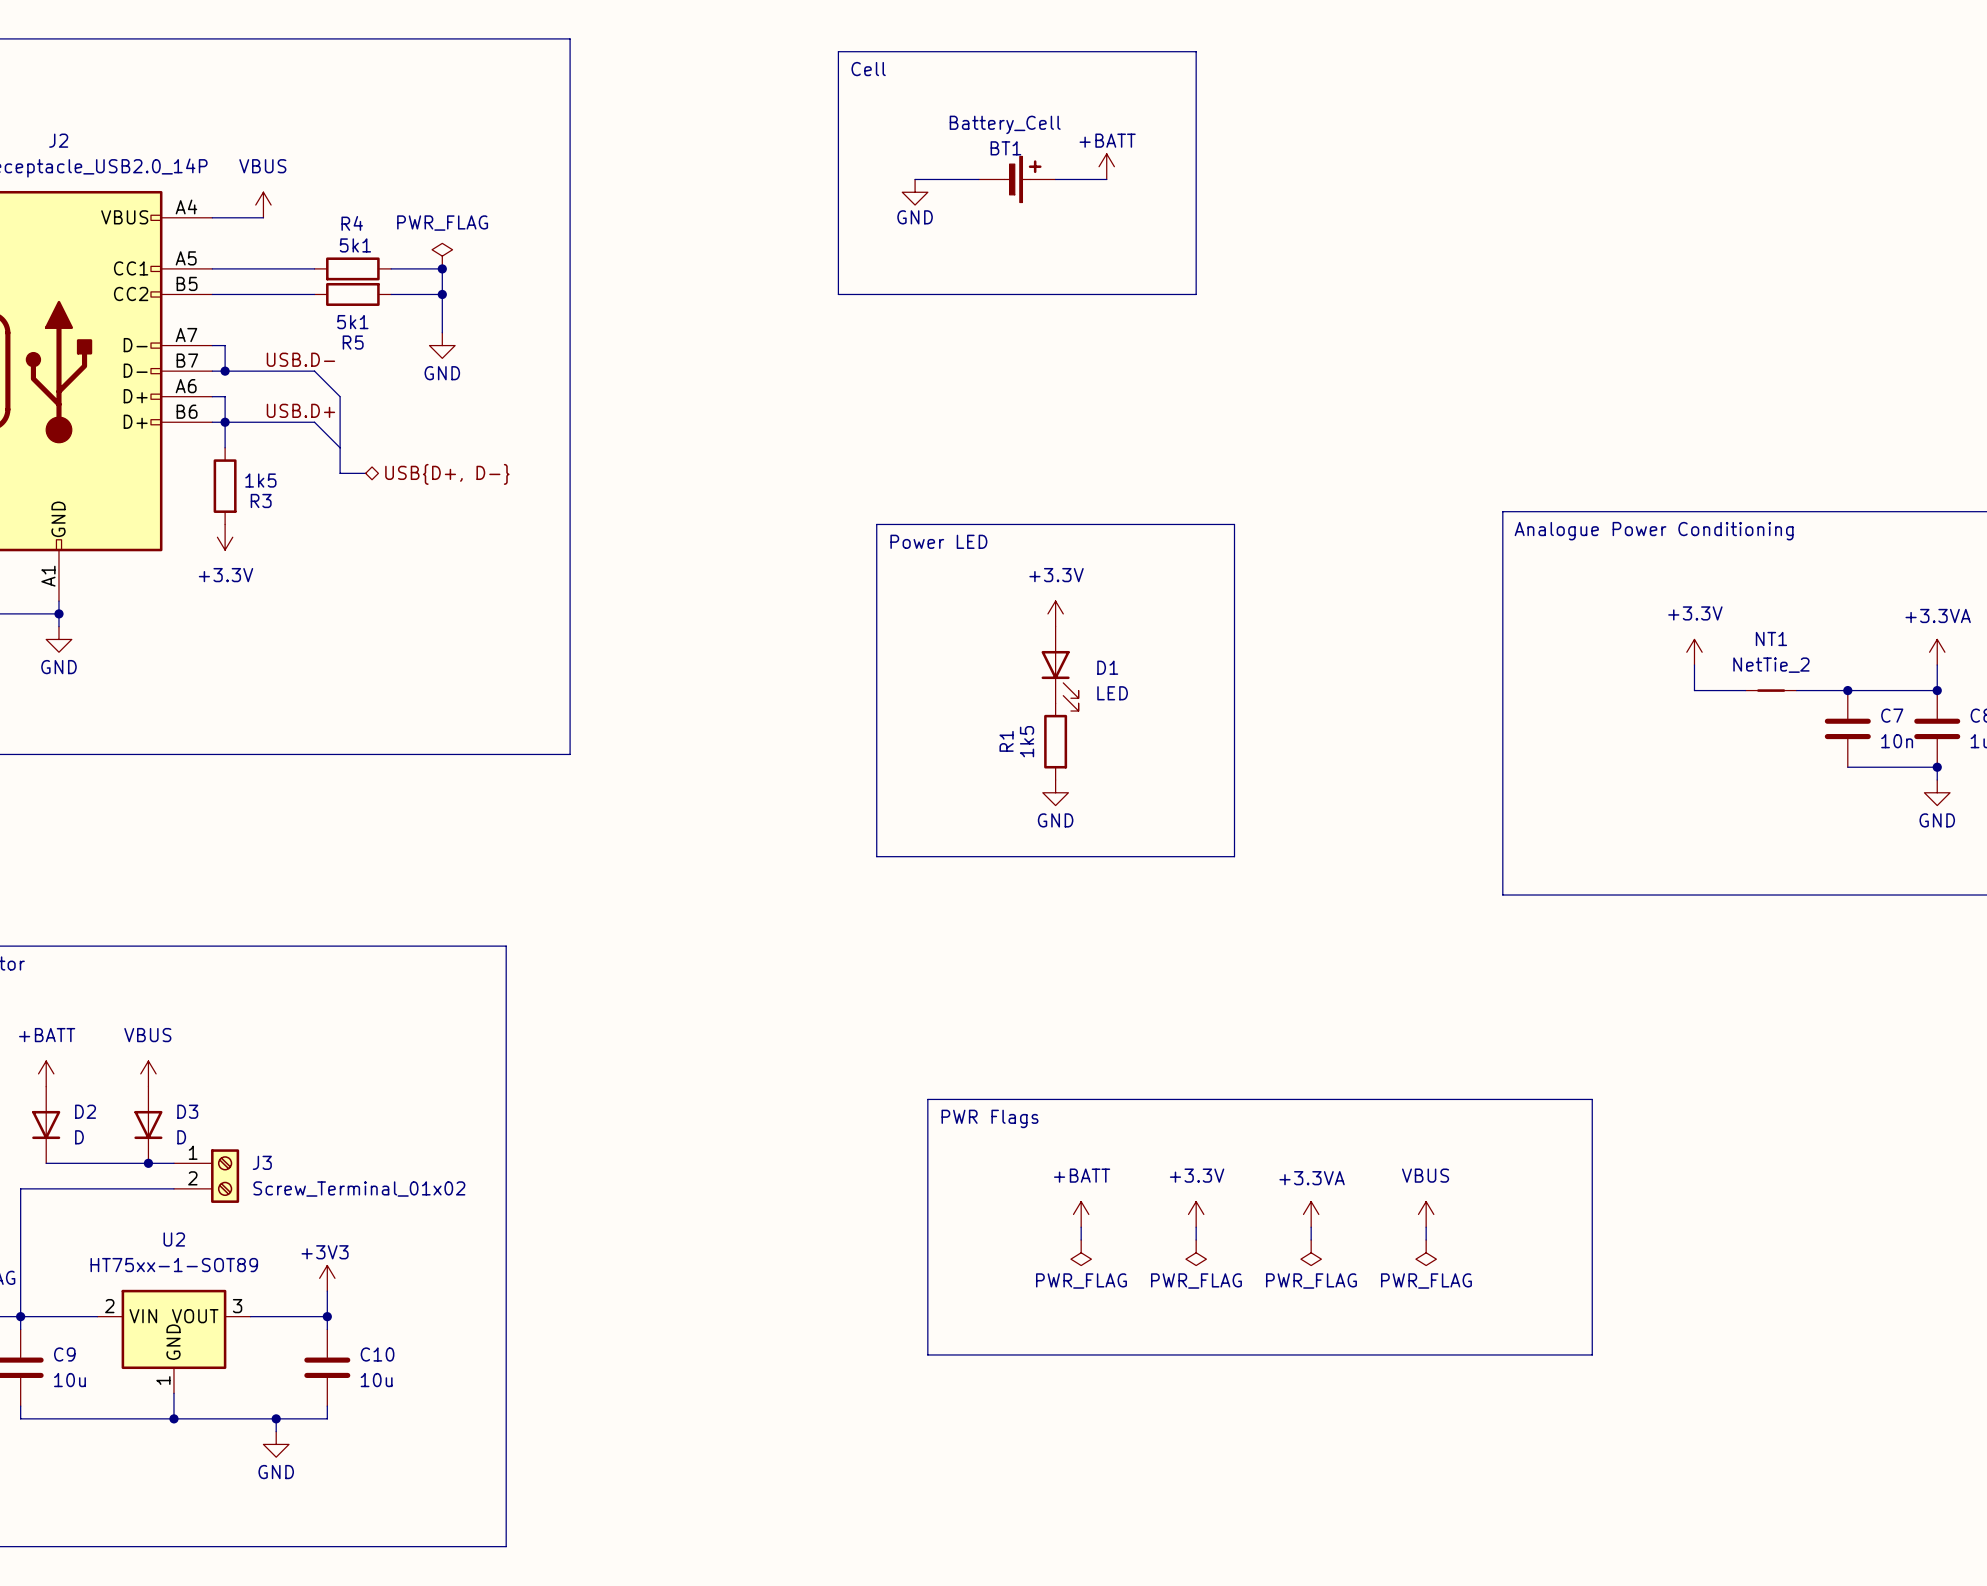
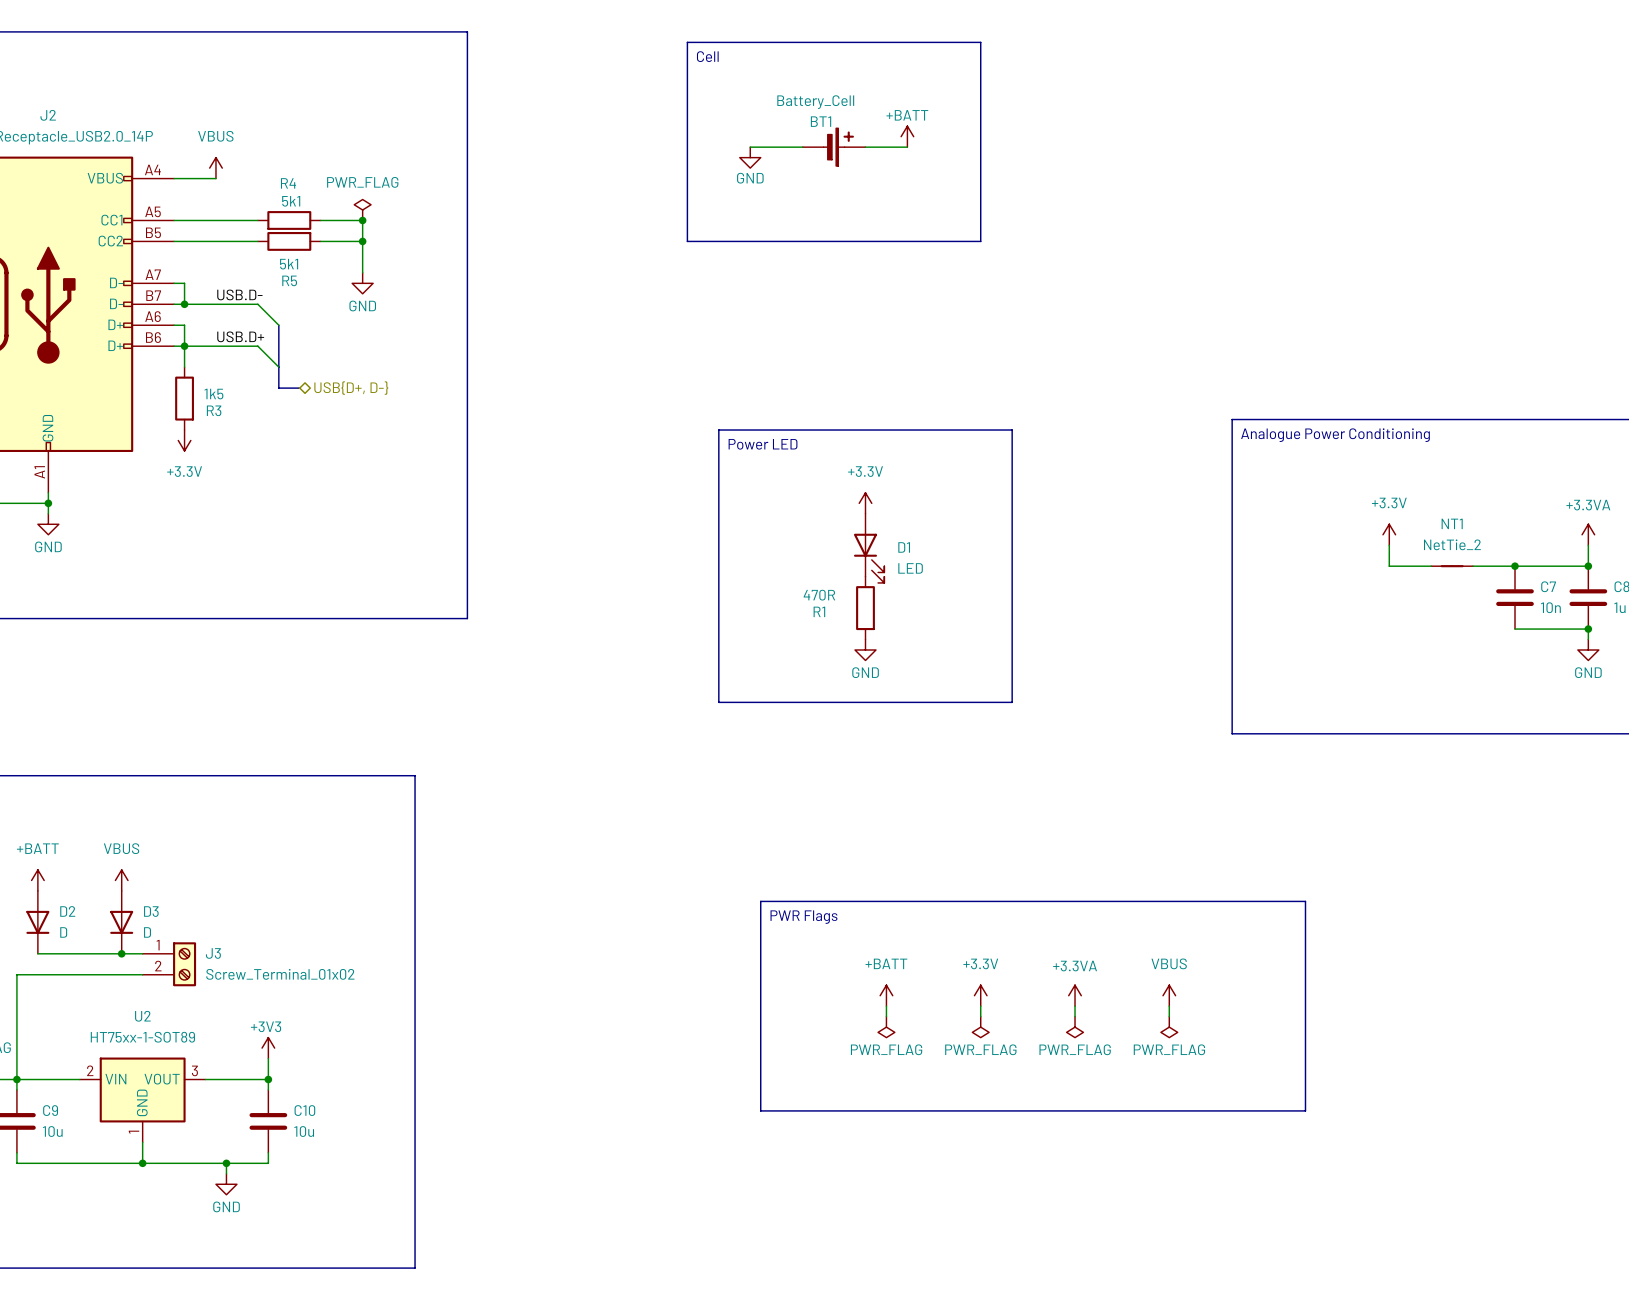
R1 name rotation: 0° (1006, 741) -> 90° clockwise (819, 611)
R1 value: 1k5 (1027, 741) -> 470R (819, 595)

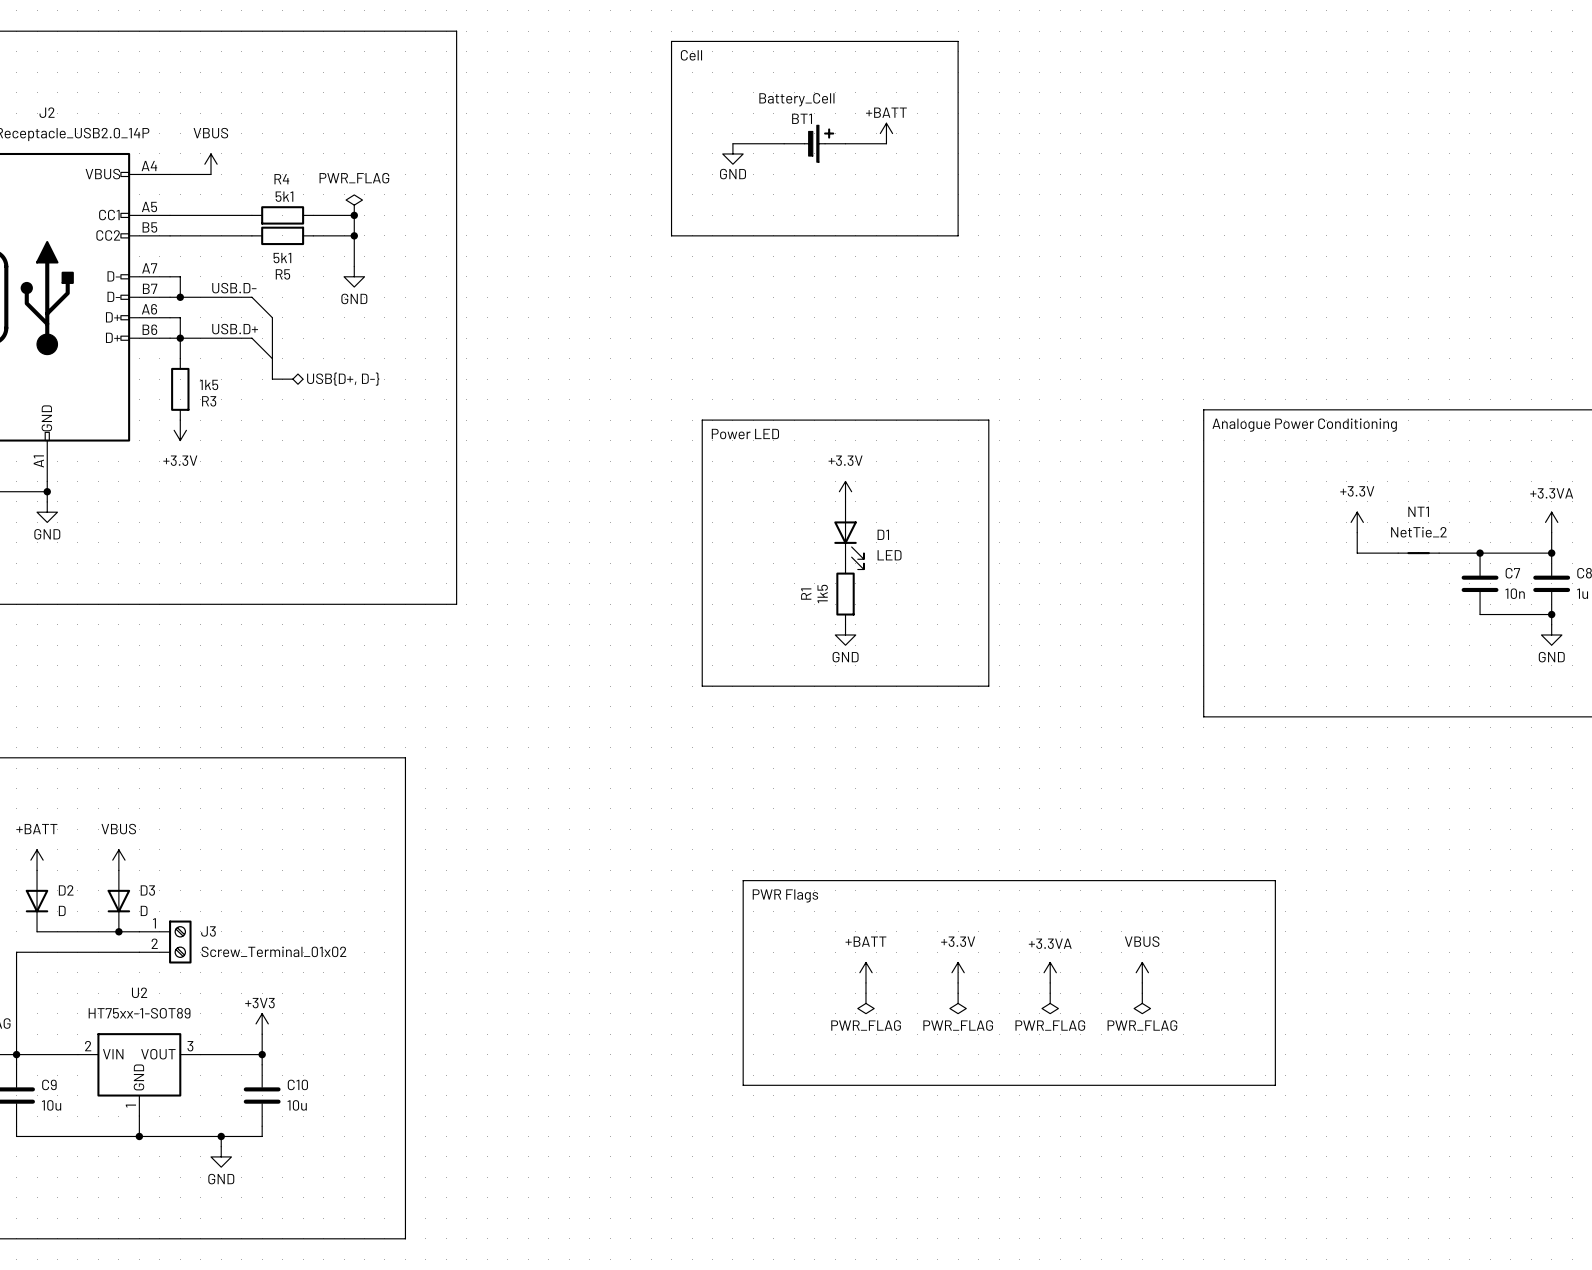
R1 value: 470R (819, 595) -> 1k5 (822, 594)
R1 name rotation: 0° (819, 611) -> 90° counterclockwise (806, 594)

